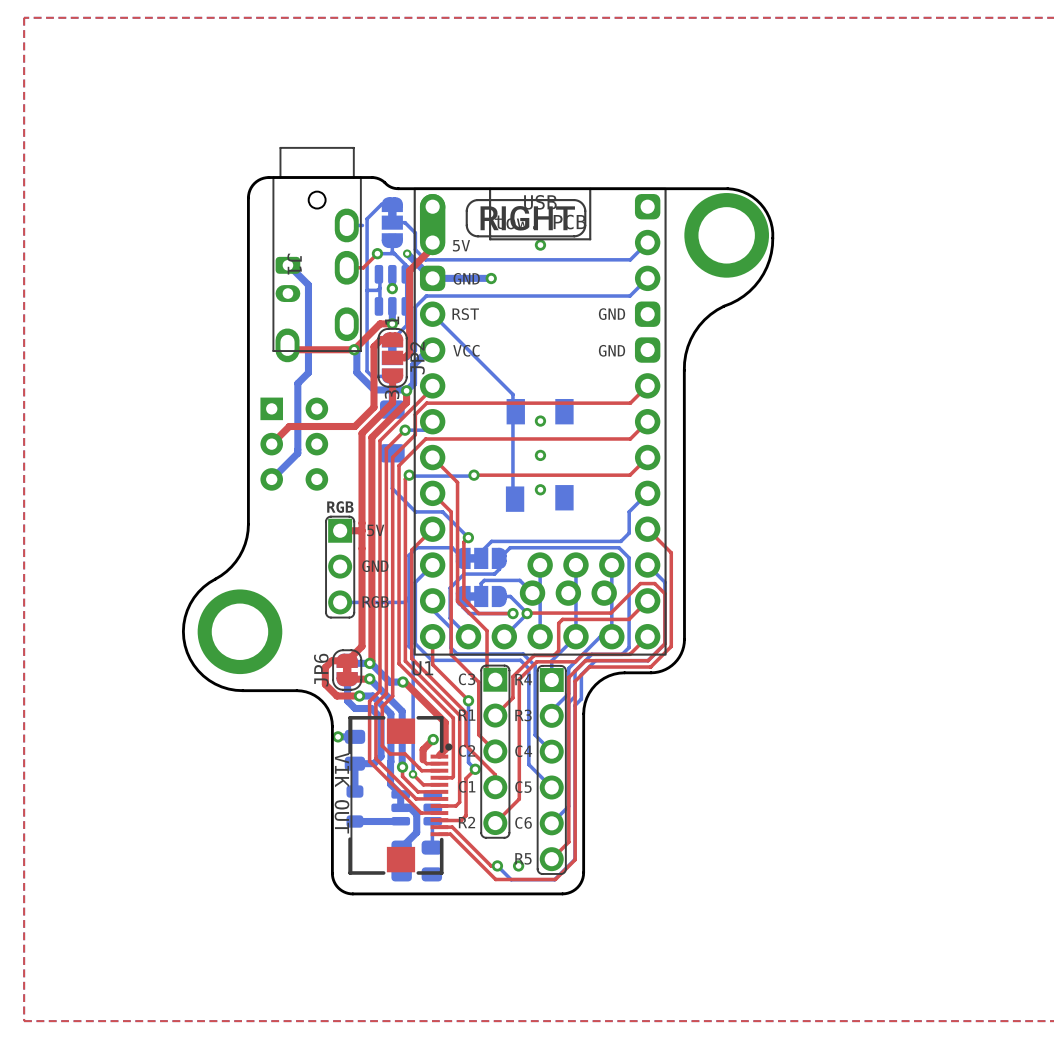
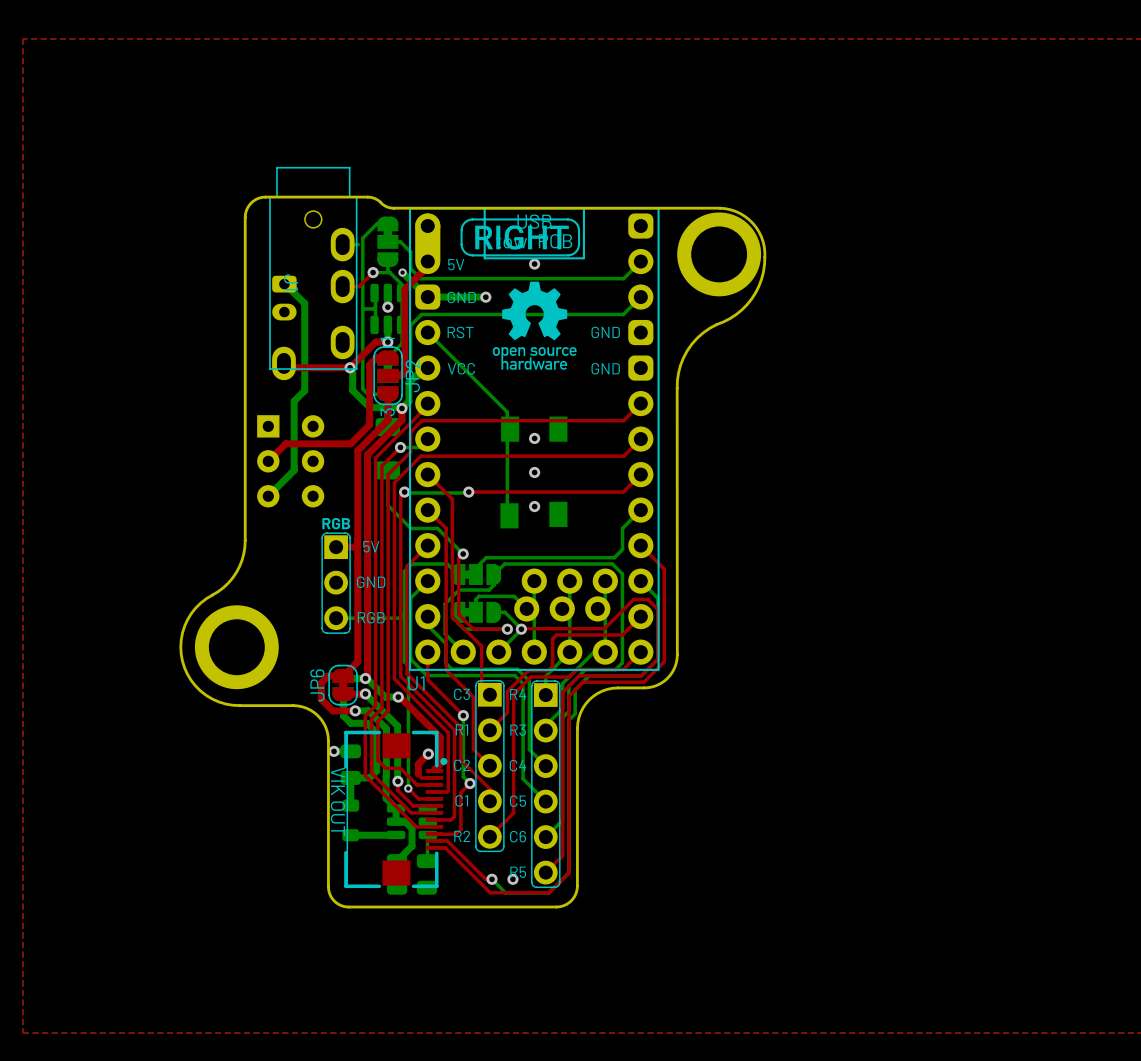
drawing: none -> [492, 281, 577, 370]

